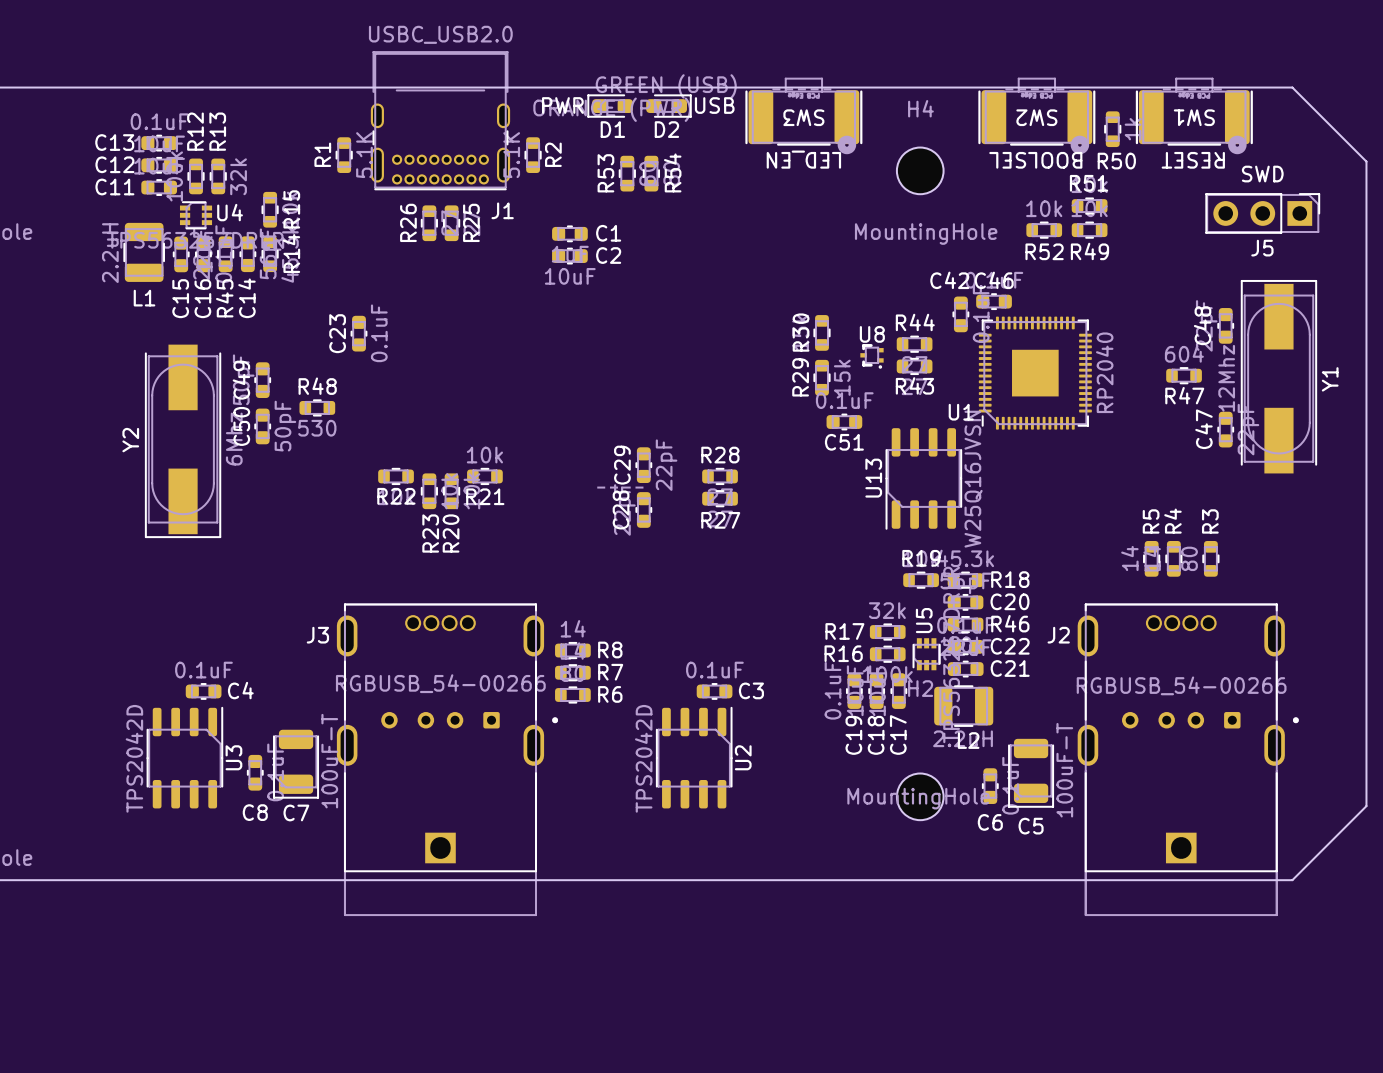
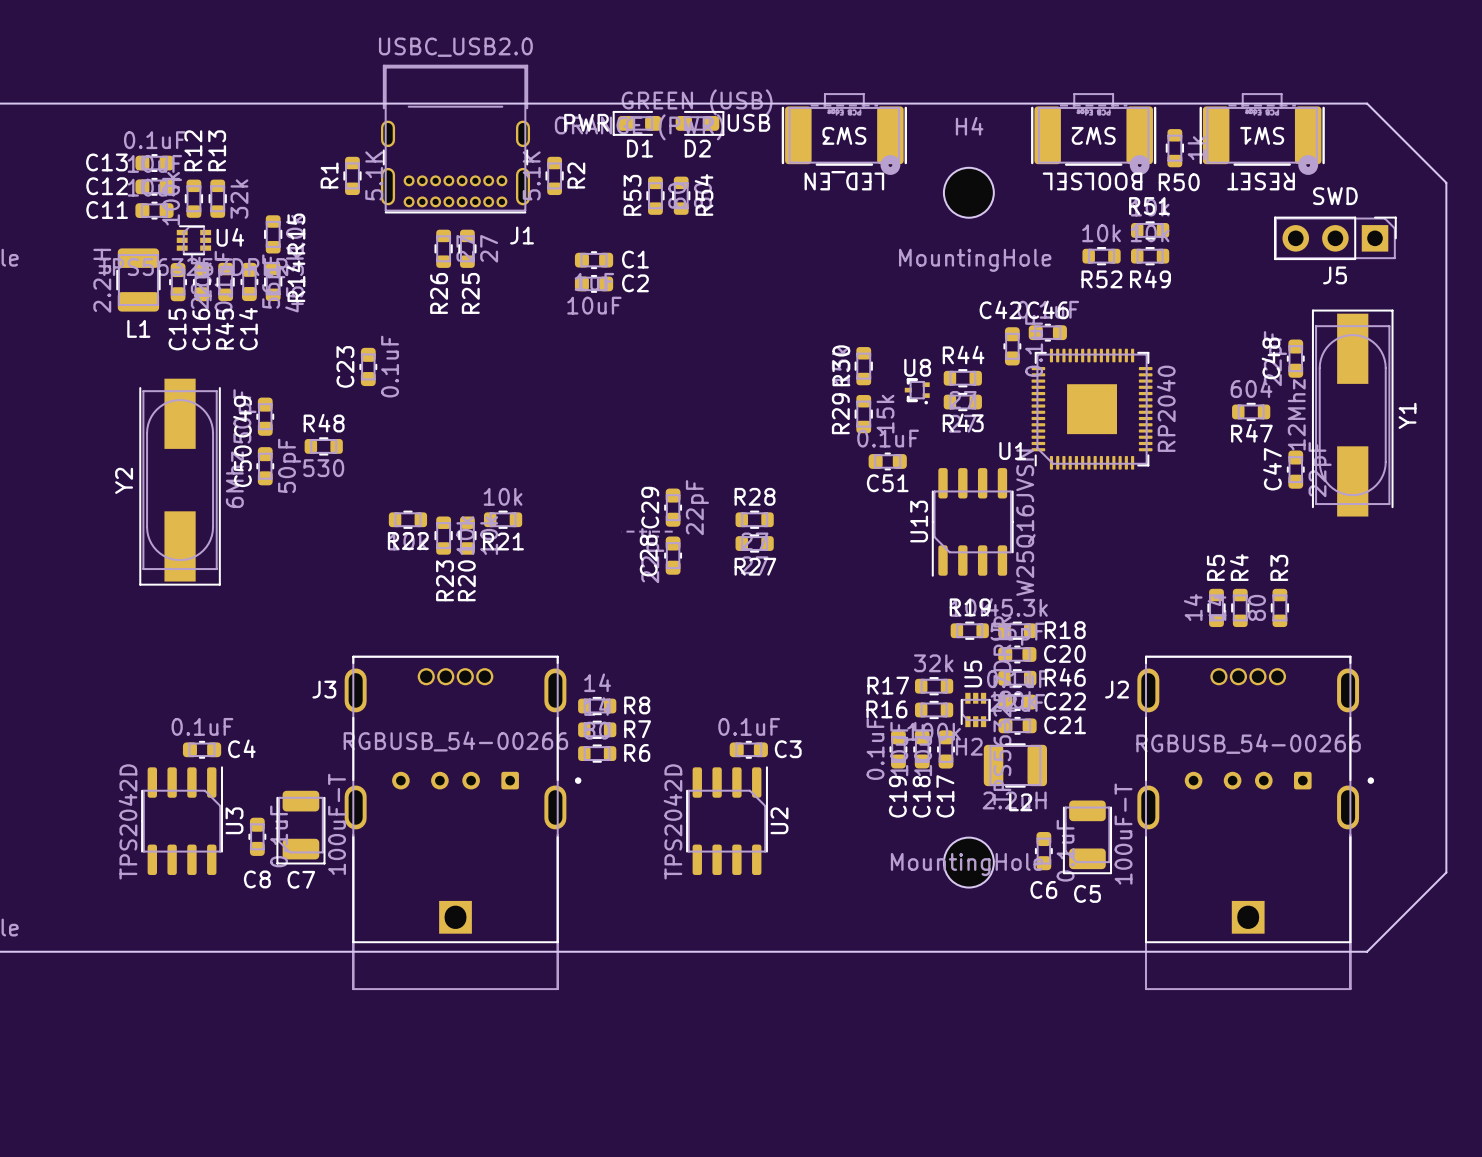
R26 name position: R26 (408, 222) -> R26 (439, 293)
R25 name position: R25 (471, 222) -> R25 (470, 293)

